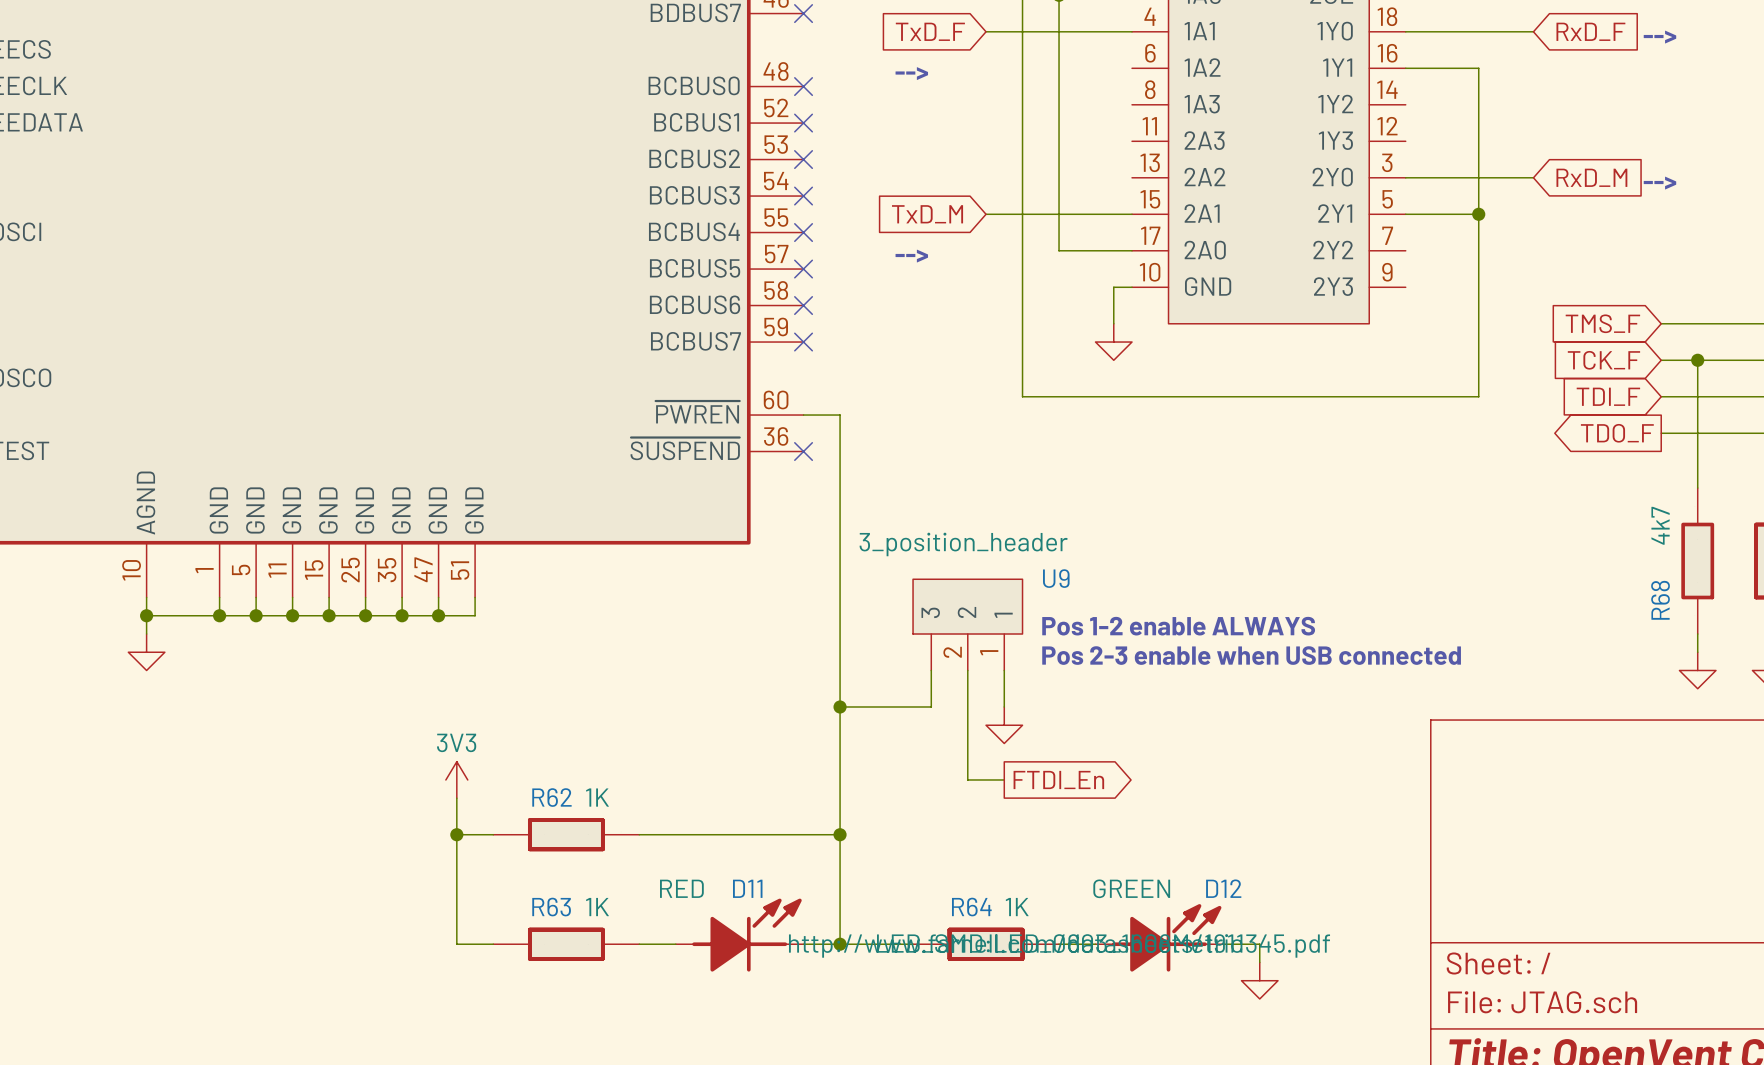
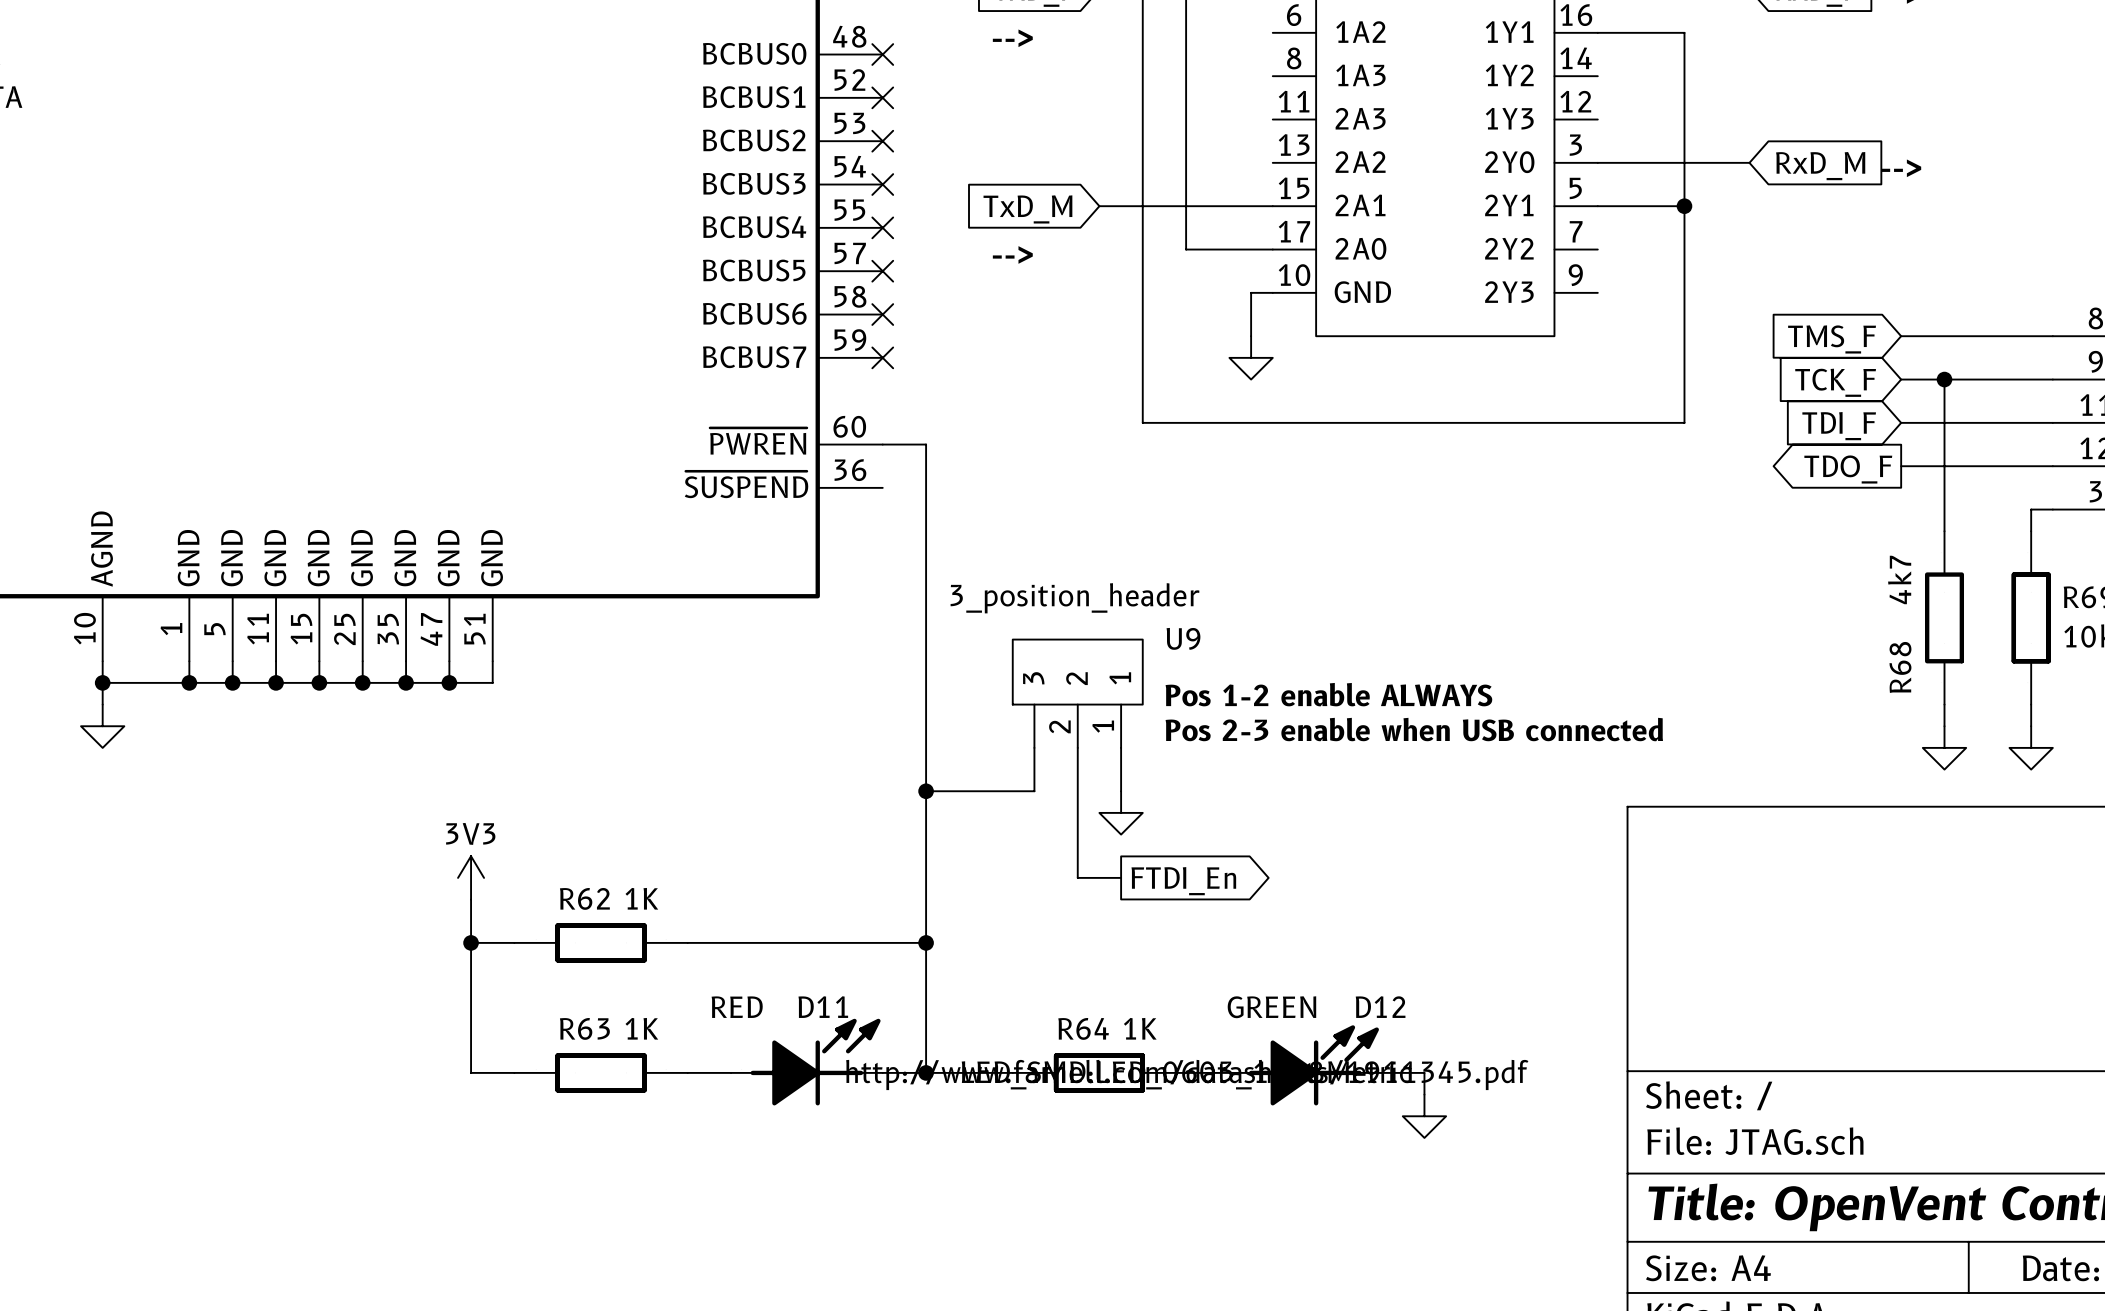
no-connect mark: (803, 451) -> none

